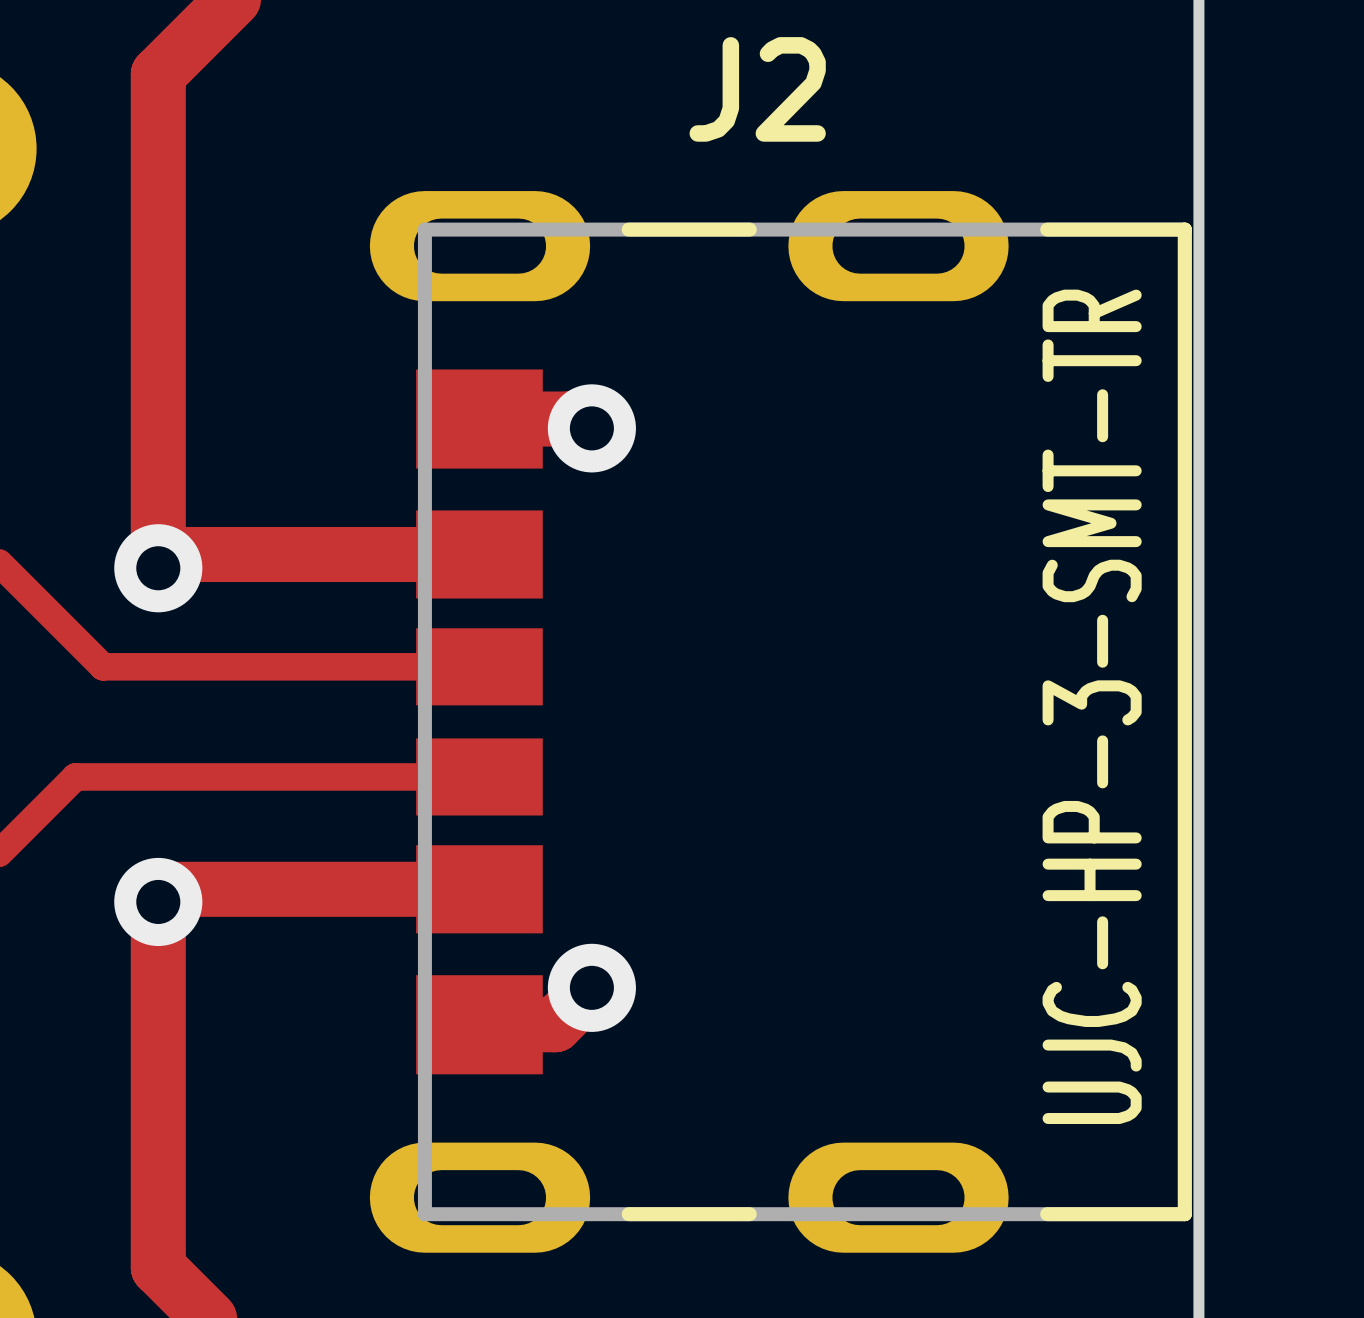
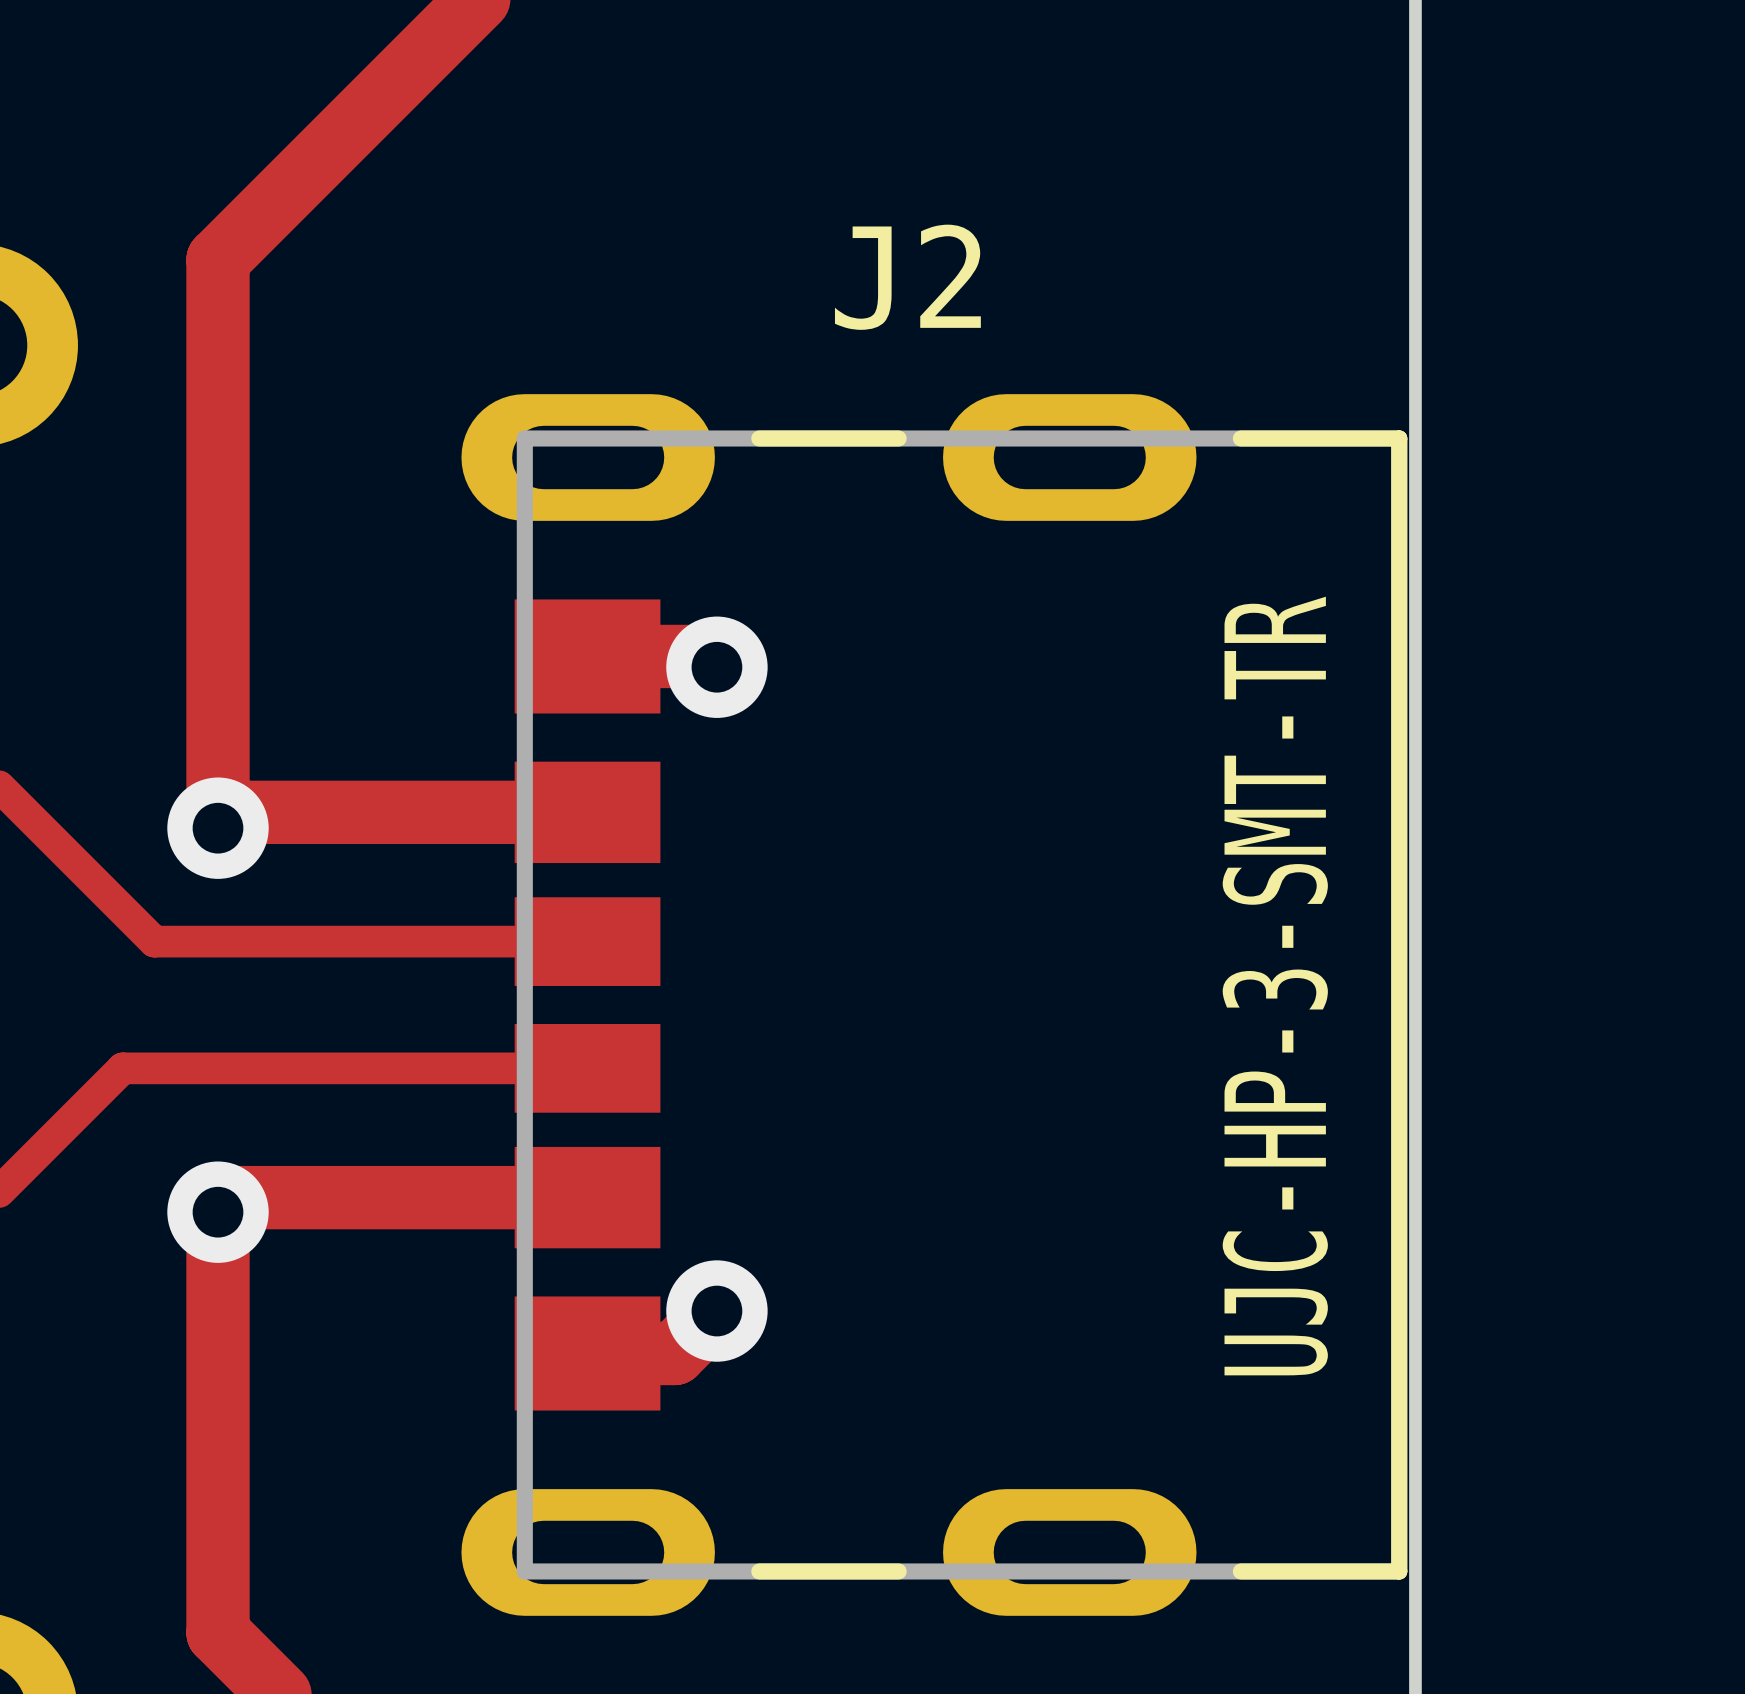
J2 value position: UJC-HP-3-SMT-TR (1092, 706) -> UJC-HP-3-SMT-TR (1275, 986)

